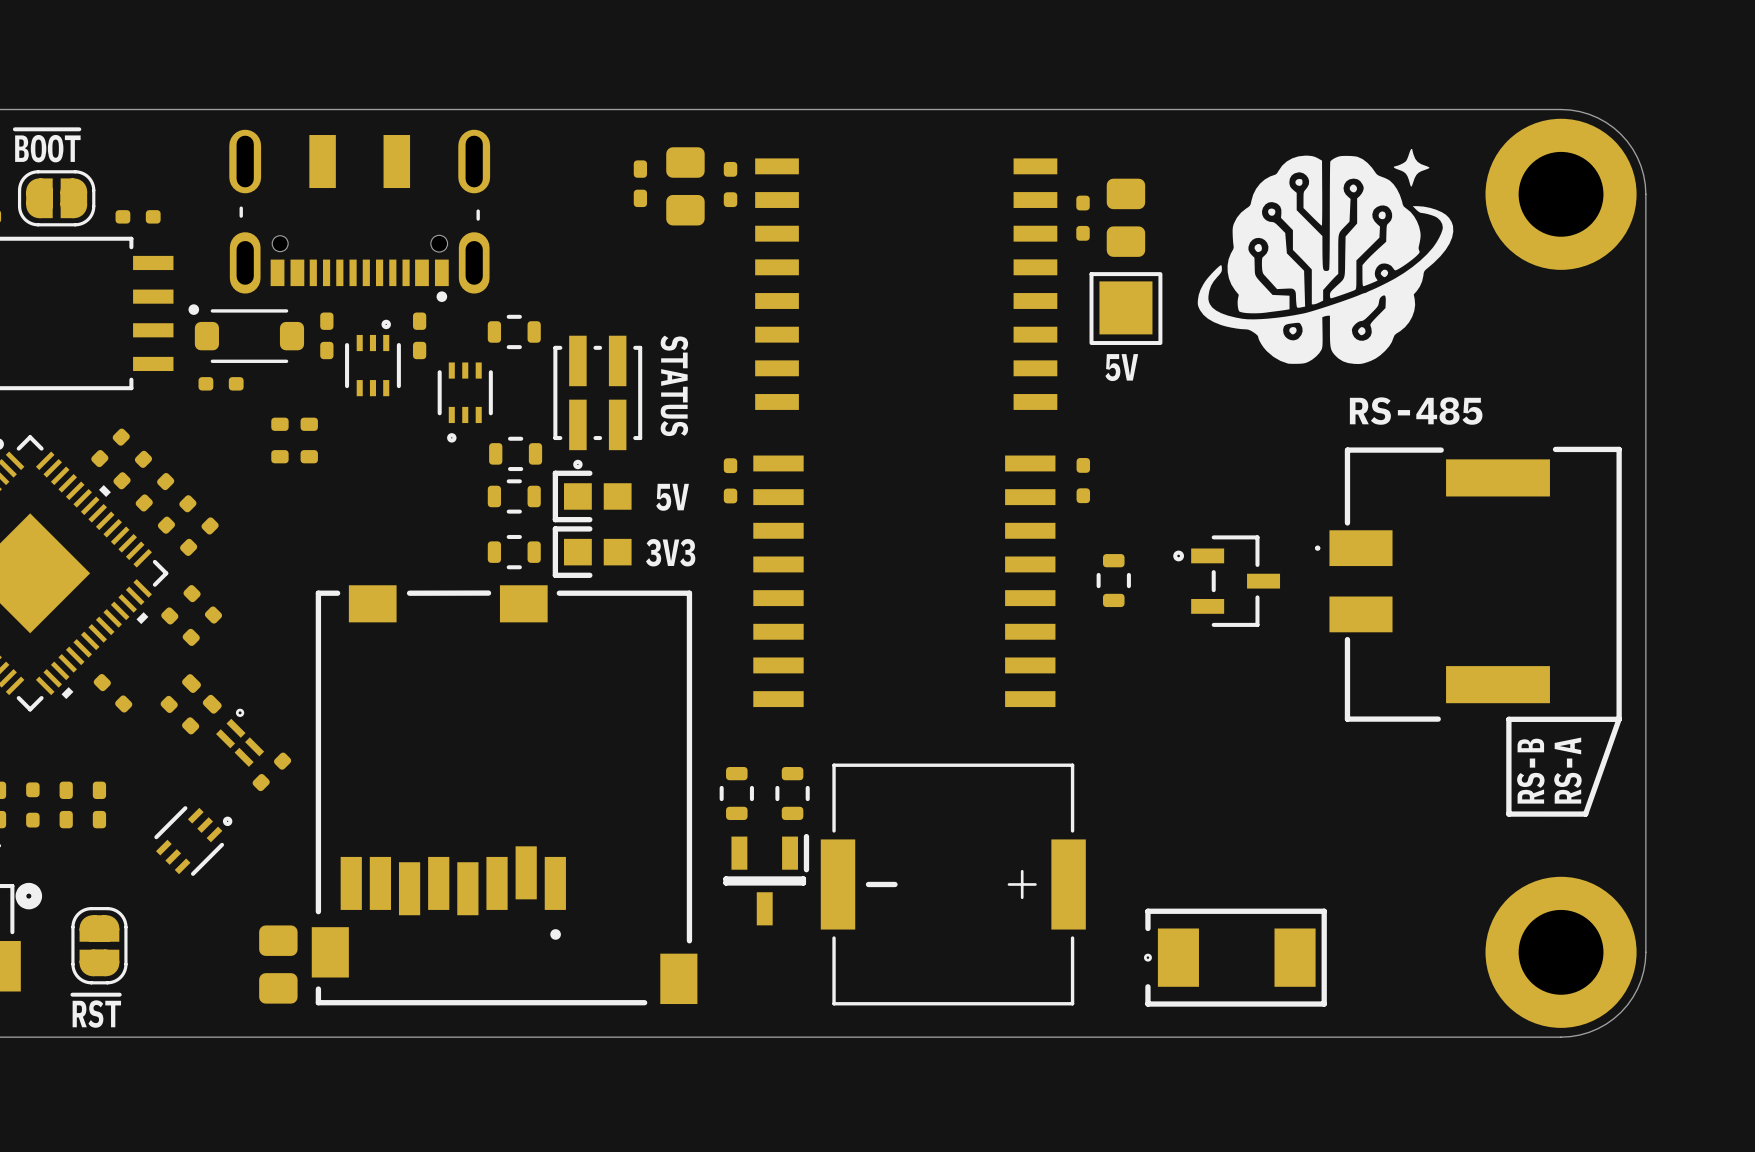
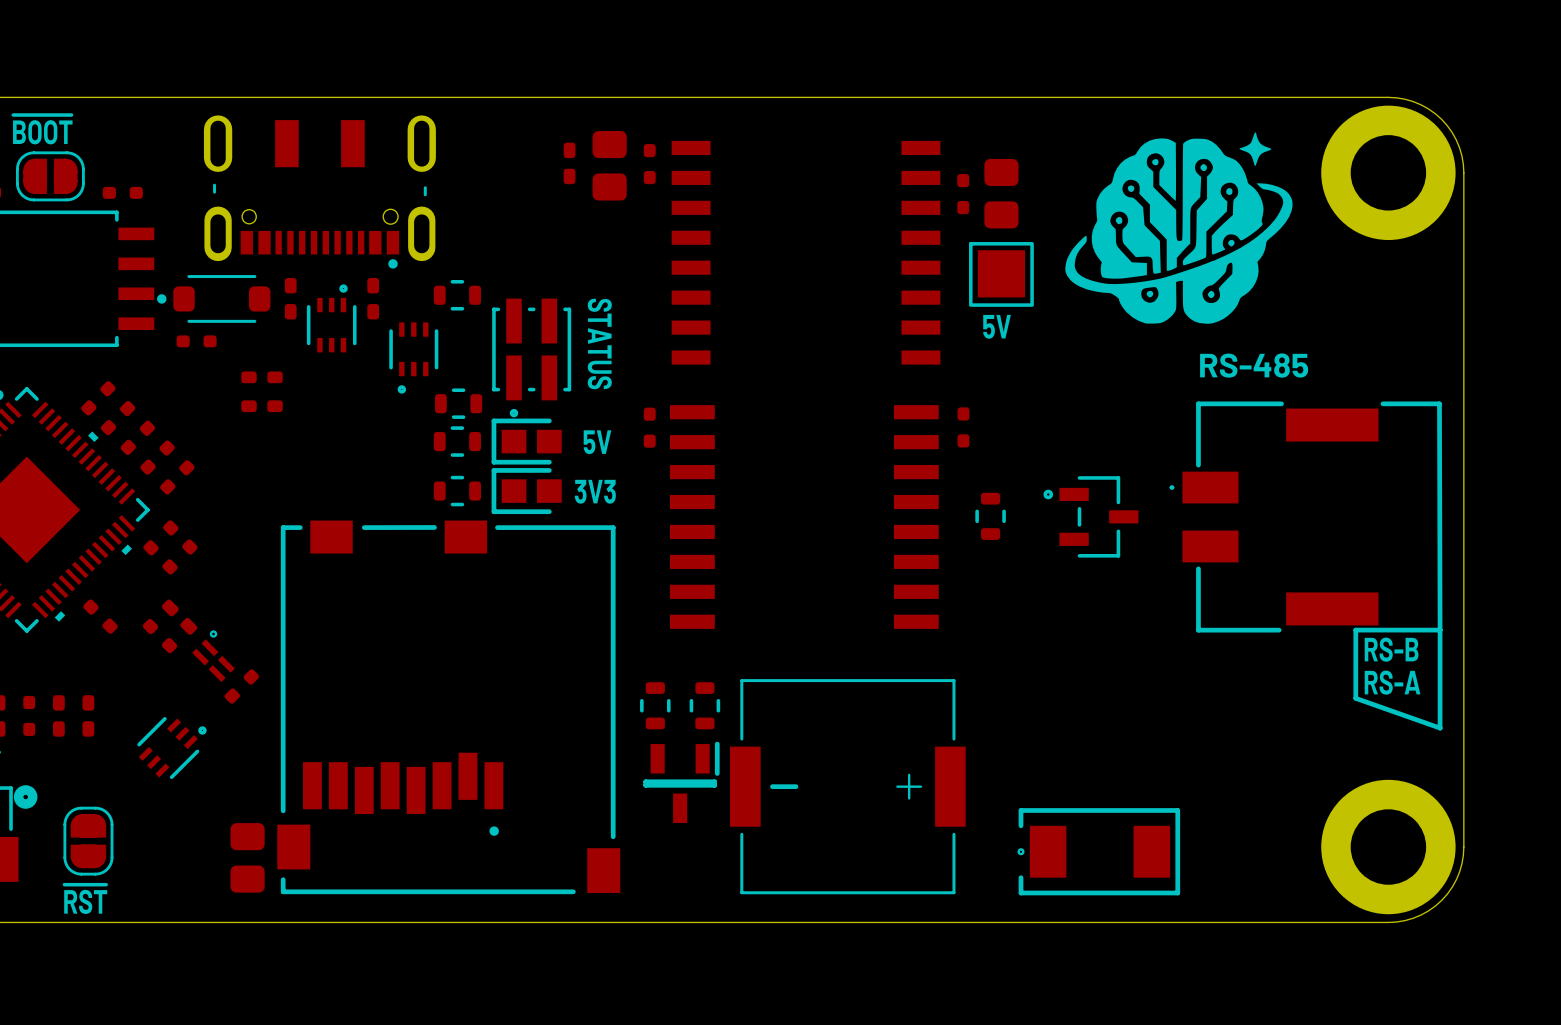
part footprint: [188, 304, 305, 363] -> [157, 275, 271, 323]
part footprint: [552, 470, 632, 523] -> [491, 418, 562, 465]
part footprint: [552, 526, 632, 578] -> [491, 468, 562, 515]
part: none -> (1306, 517)
part: (1468, 631) -> none
text: none -> RS-B (1391, 649)
text: none -> RS-A (1392, 682)
line: none -> (1440, 728) (1440, 630) (1355, 630) (1355, 698) (1440, 728)

